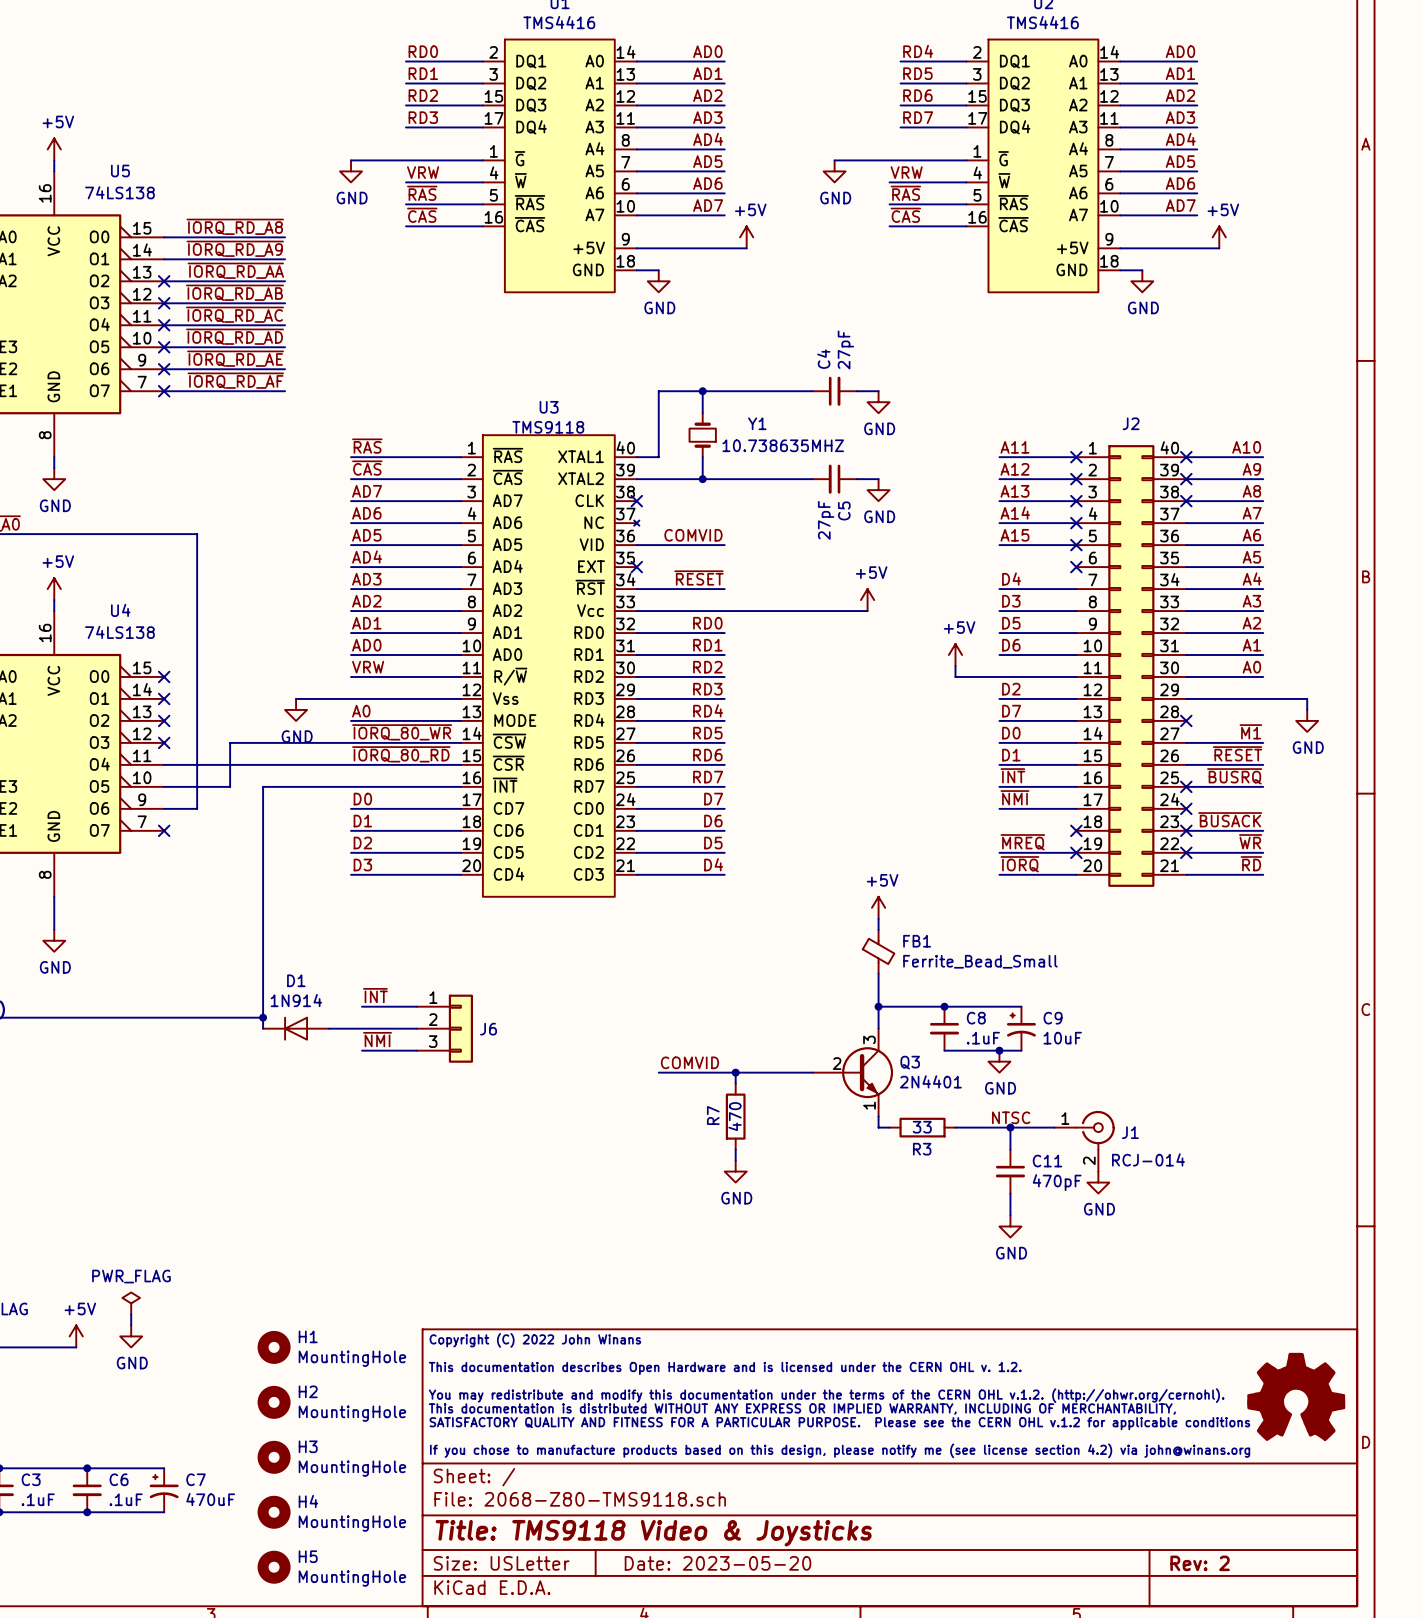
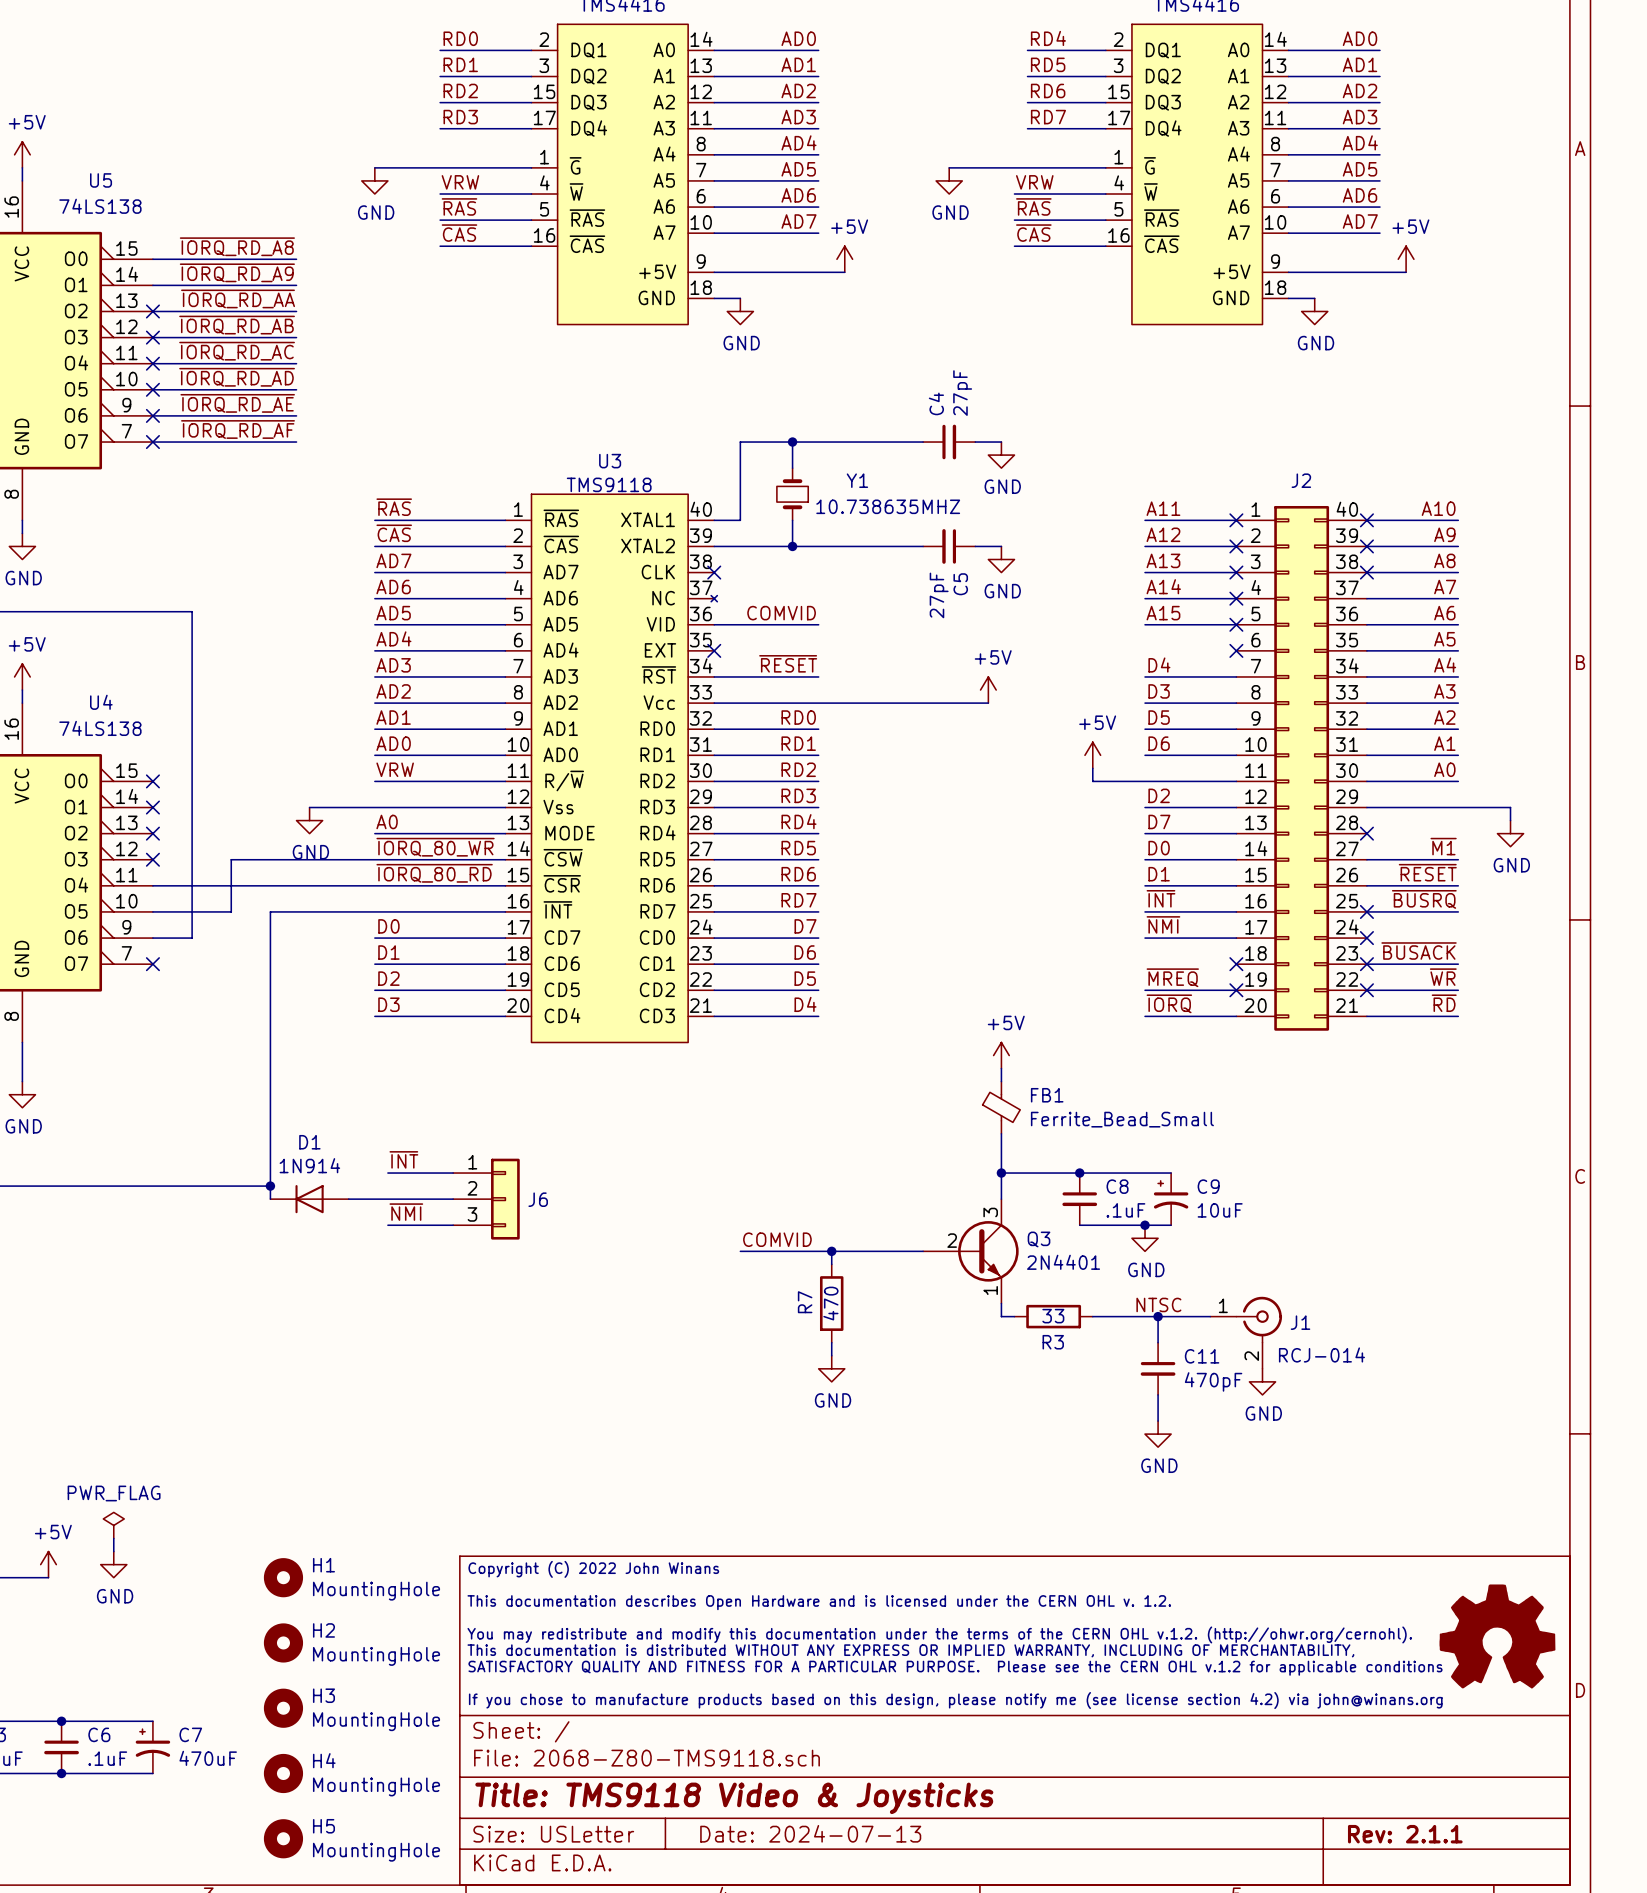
title block: Date: 2023-05-20 (717, 1563) -> Date: 2024-07-13 (810, 1833)
title block: Rev: 2 (1200, 1563) -> Rev: 2.1.1 (1405, 1834)

